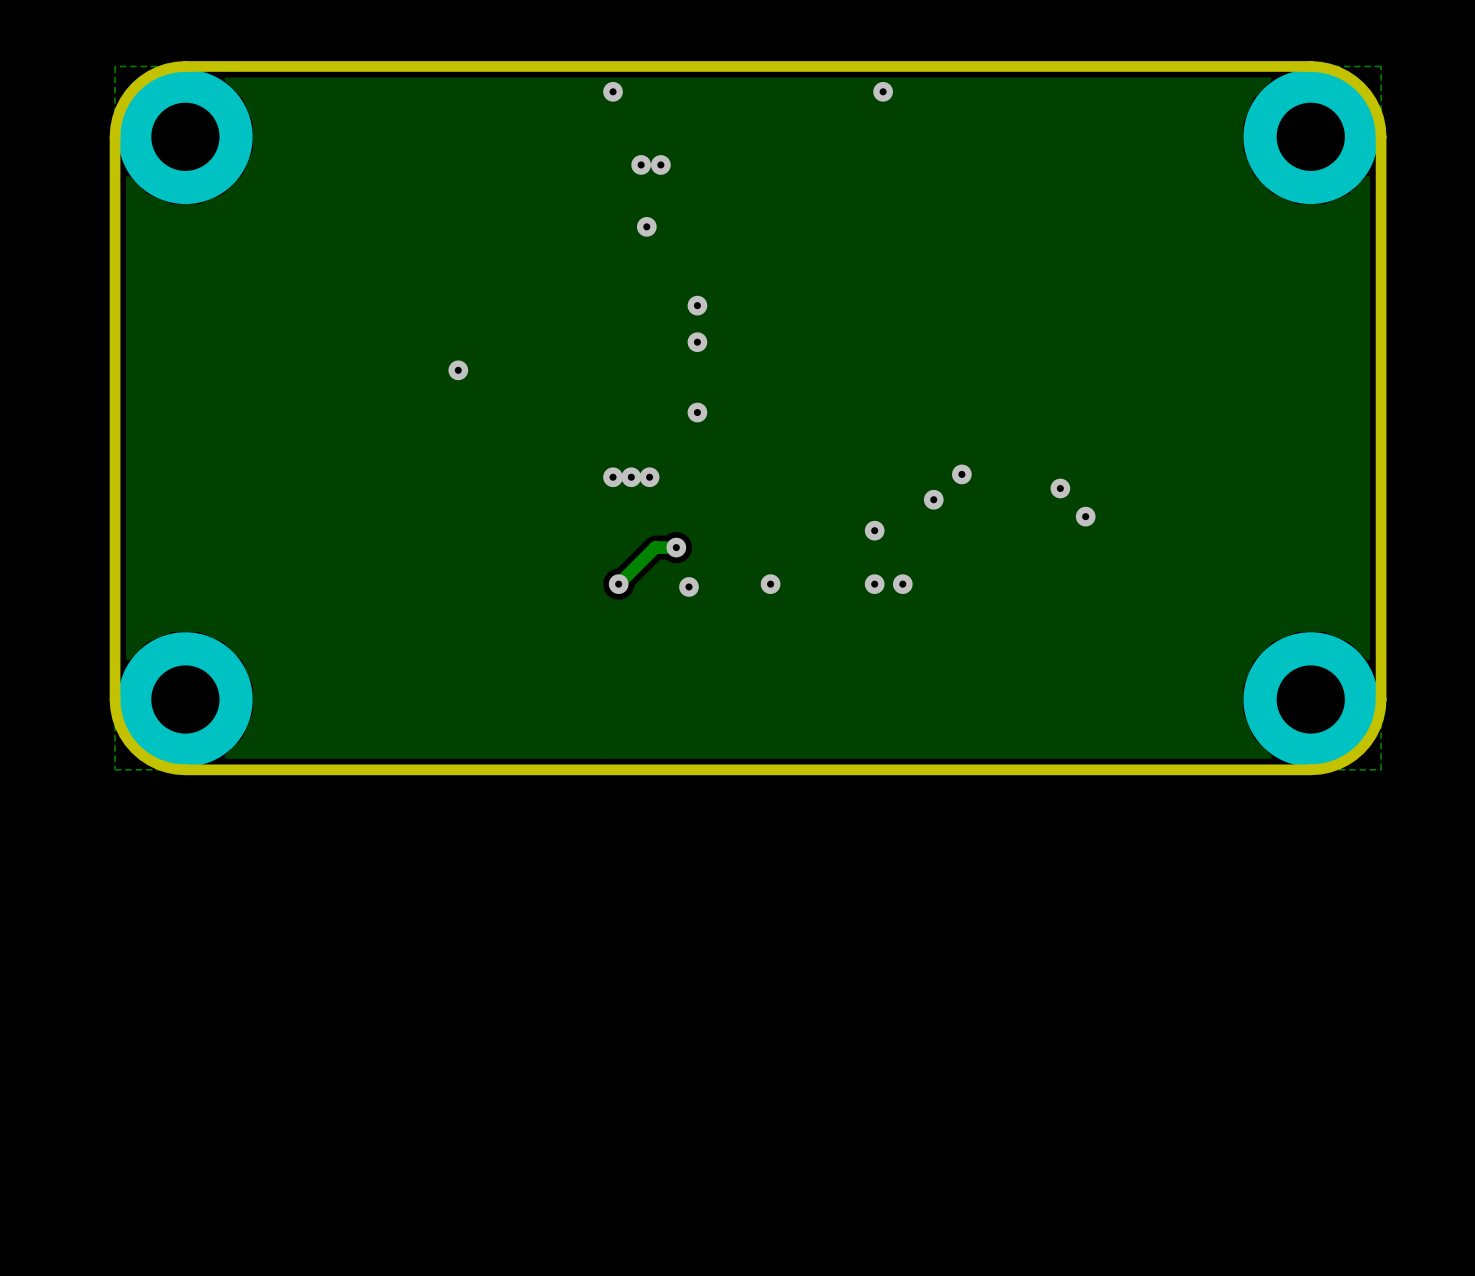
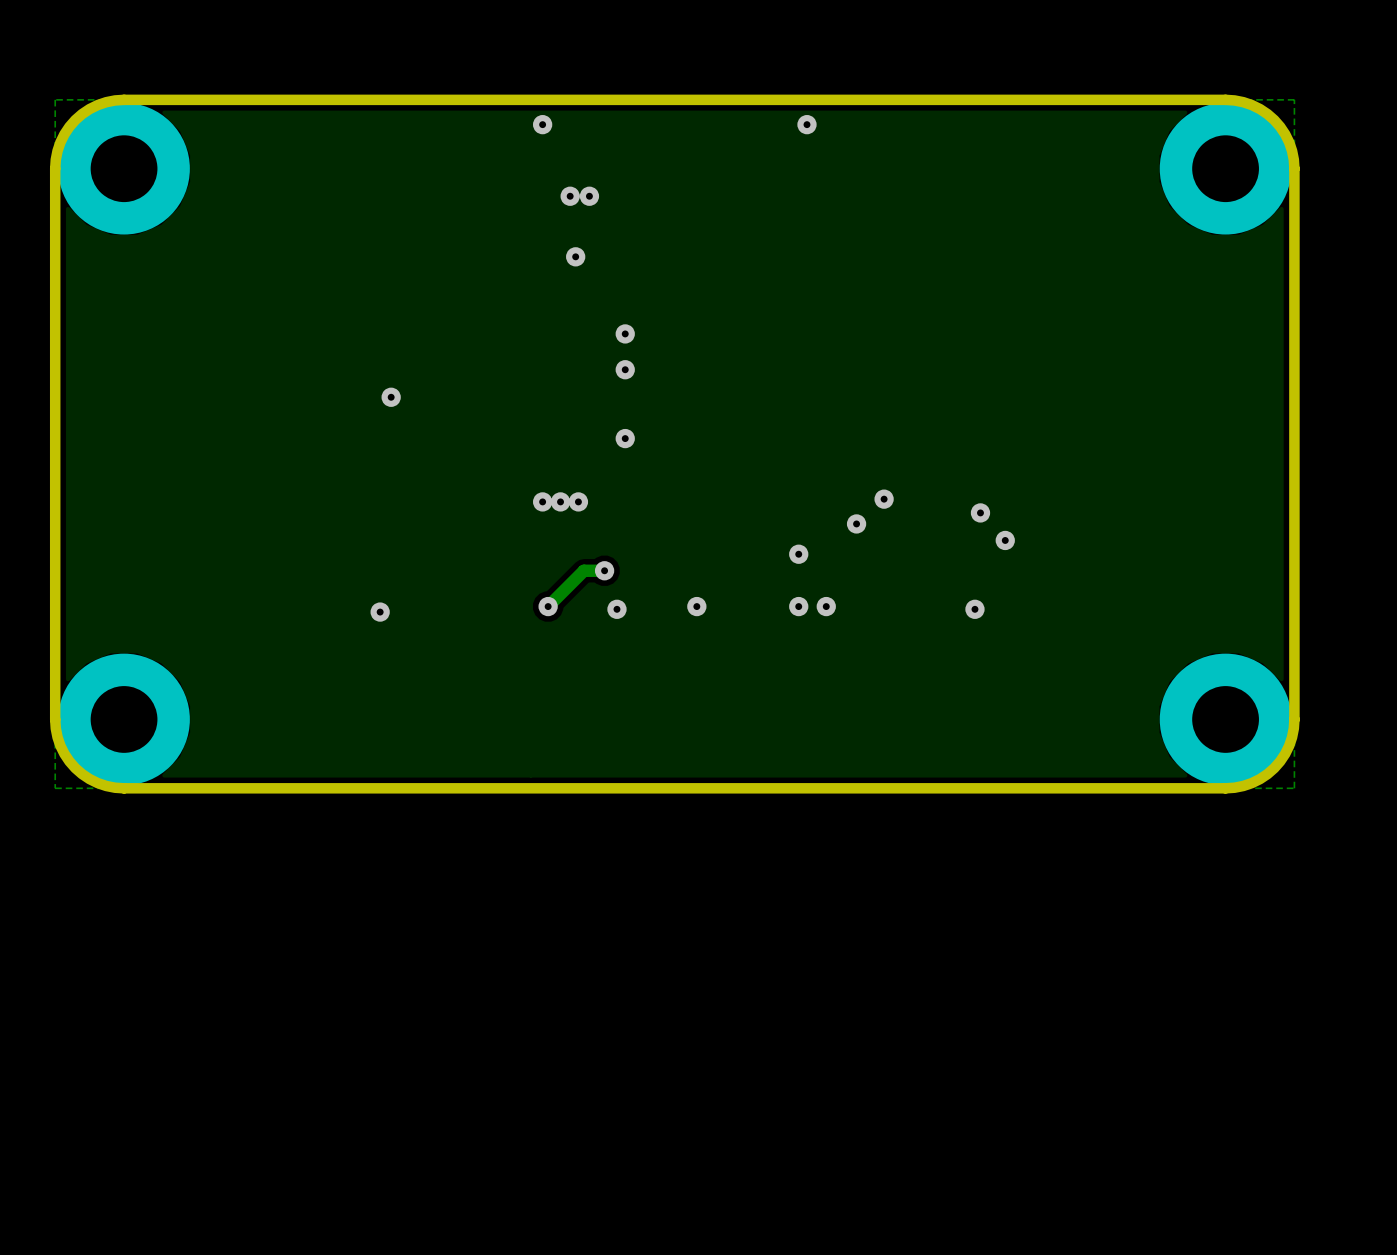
via: none -> (974, 609)
via: none -> (380, 612)

